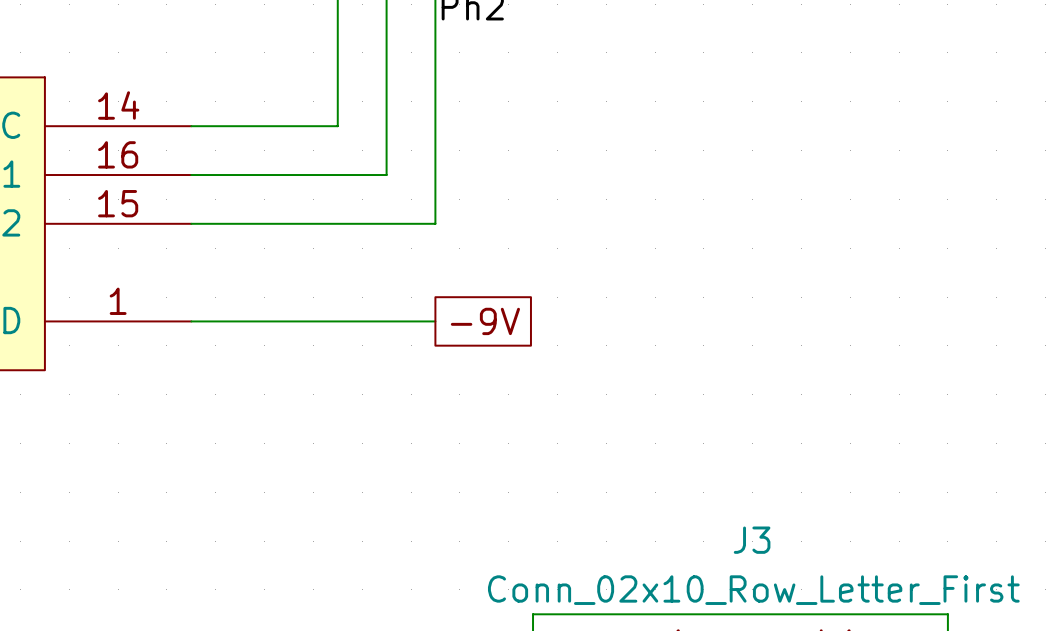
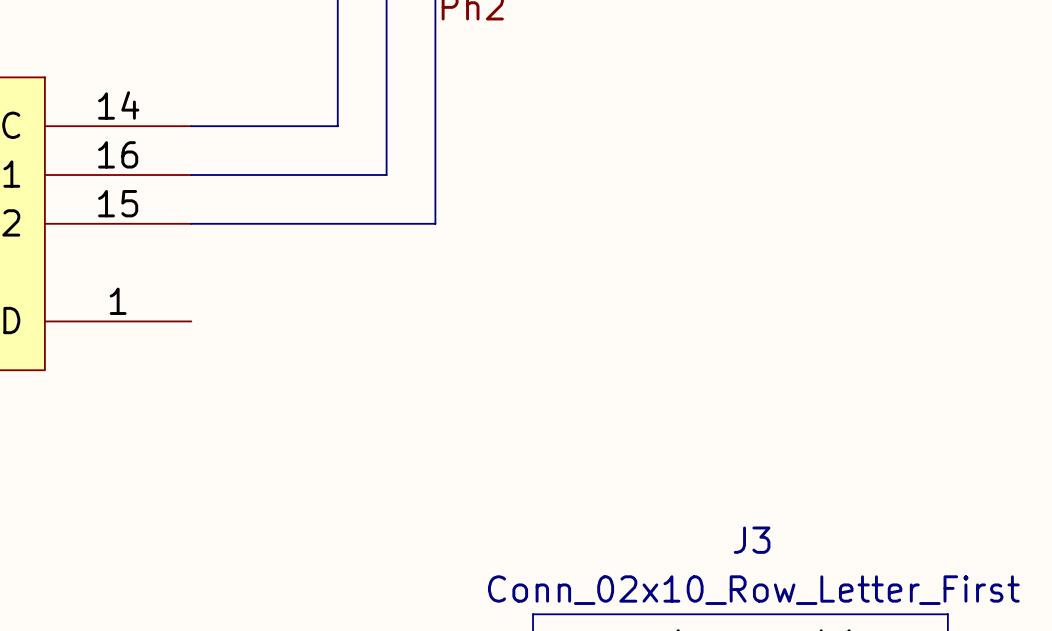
wire: (191, 321) (435, 321) -> none
global label: -9V (485, 321) -> none

